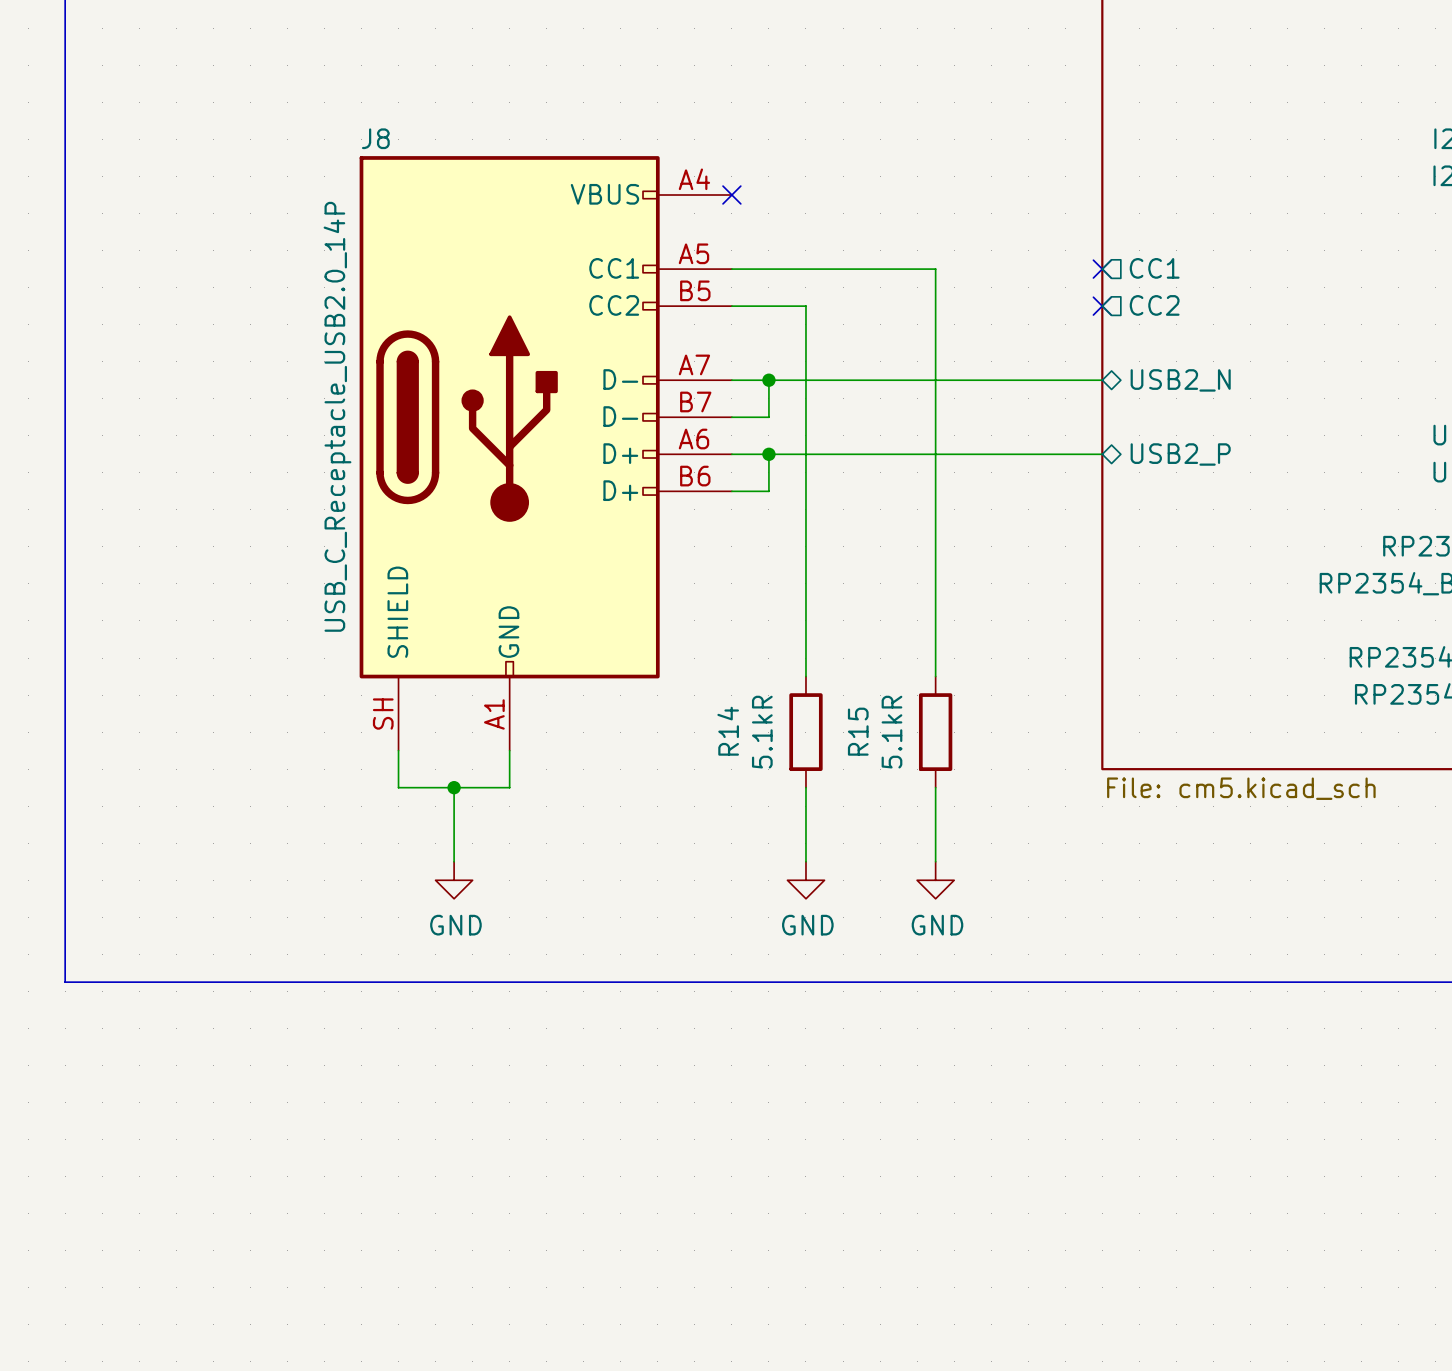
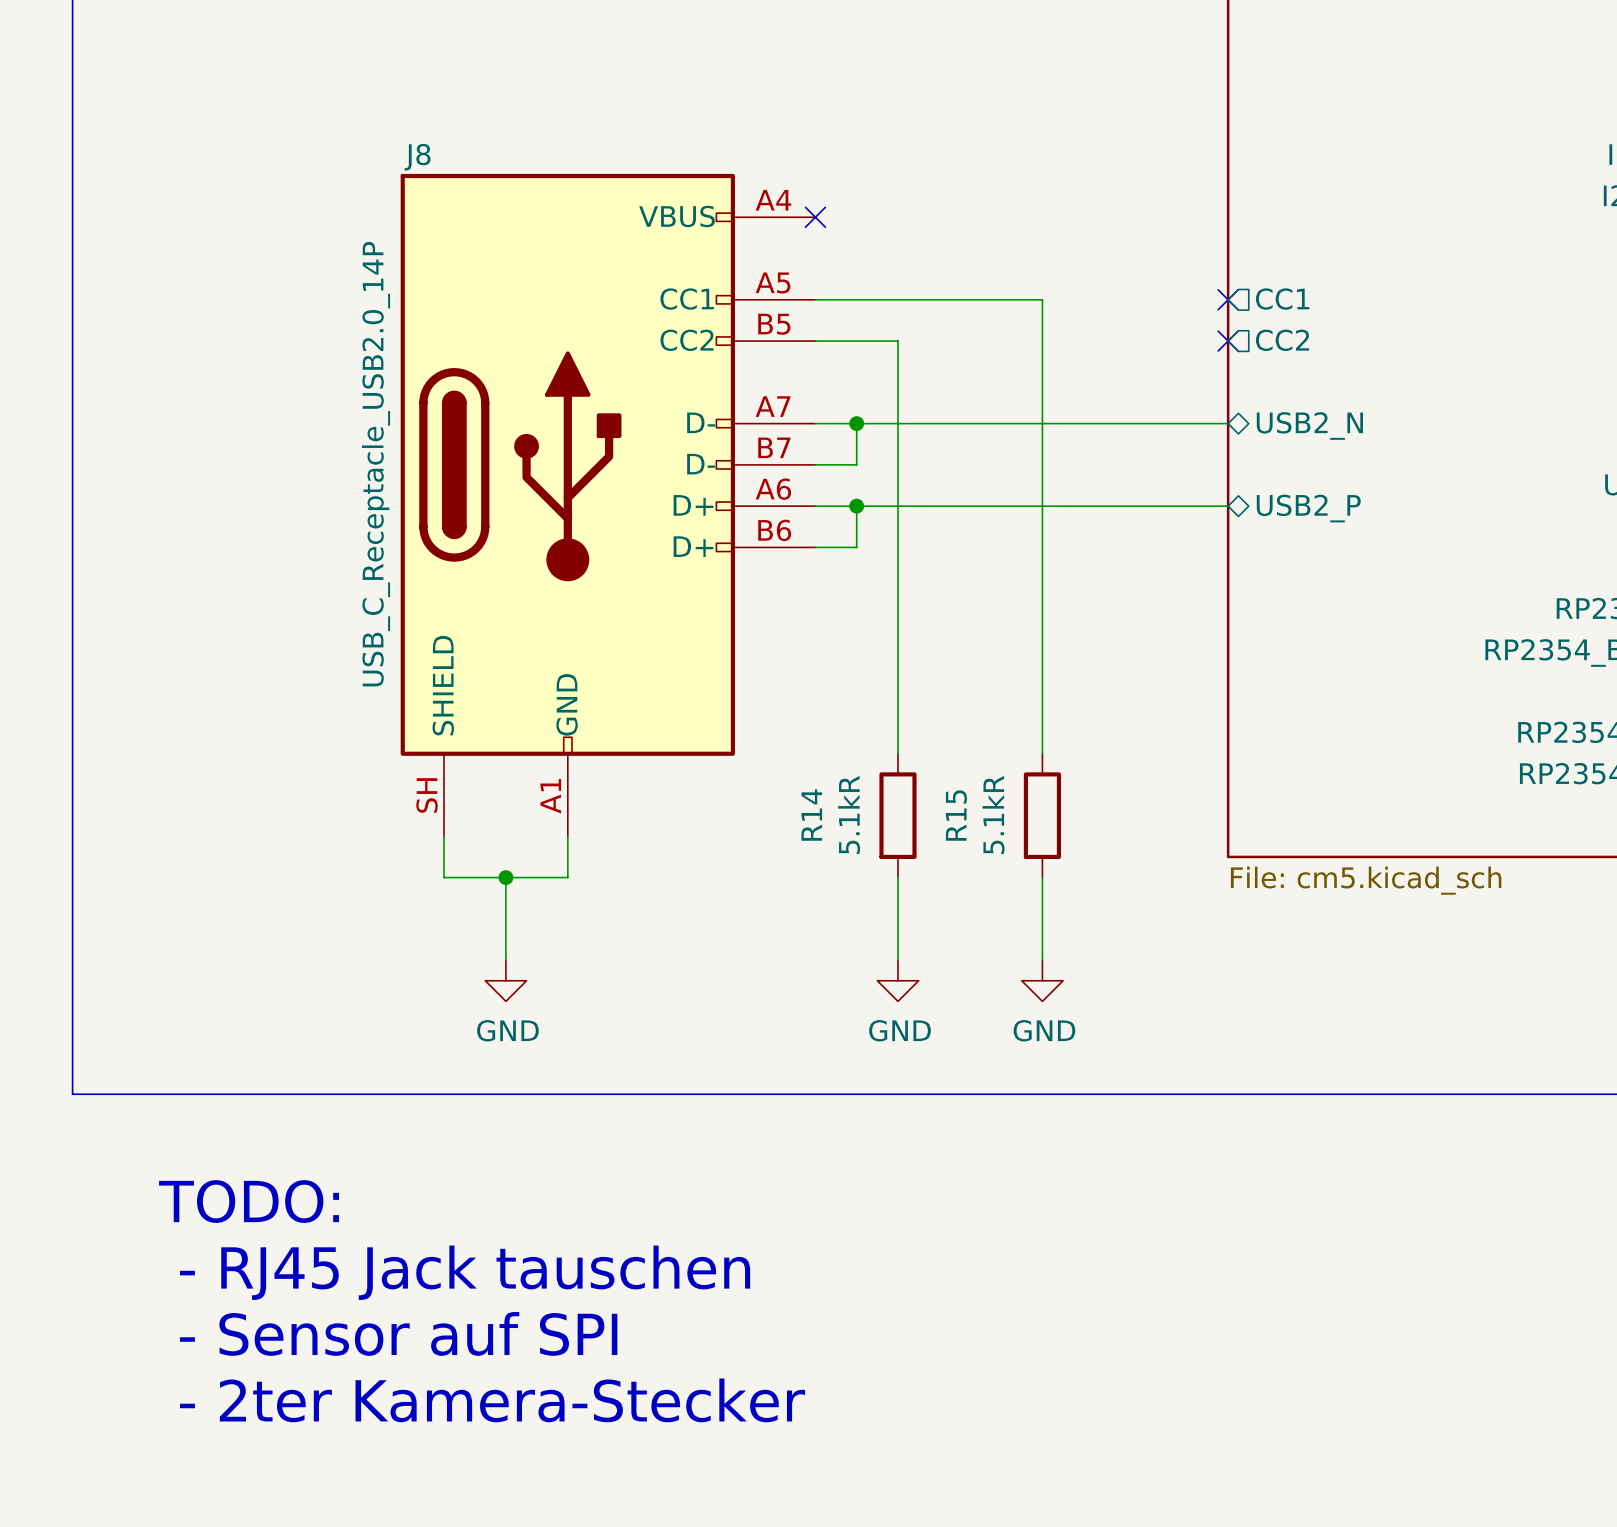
text: none -> TODO: (249, 1201)
text: none -> - RJ45 Jack tauschen (465, 1272)
text: none -> - Sensor auf SPI (398, 1333)
text: none -> - 2ter Kamera-Stecker (492, 1400)

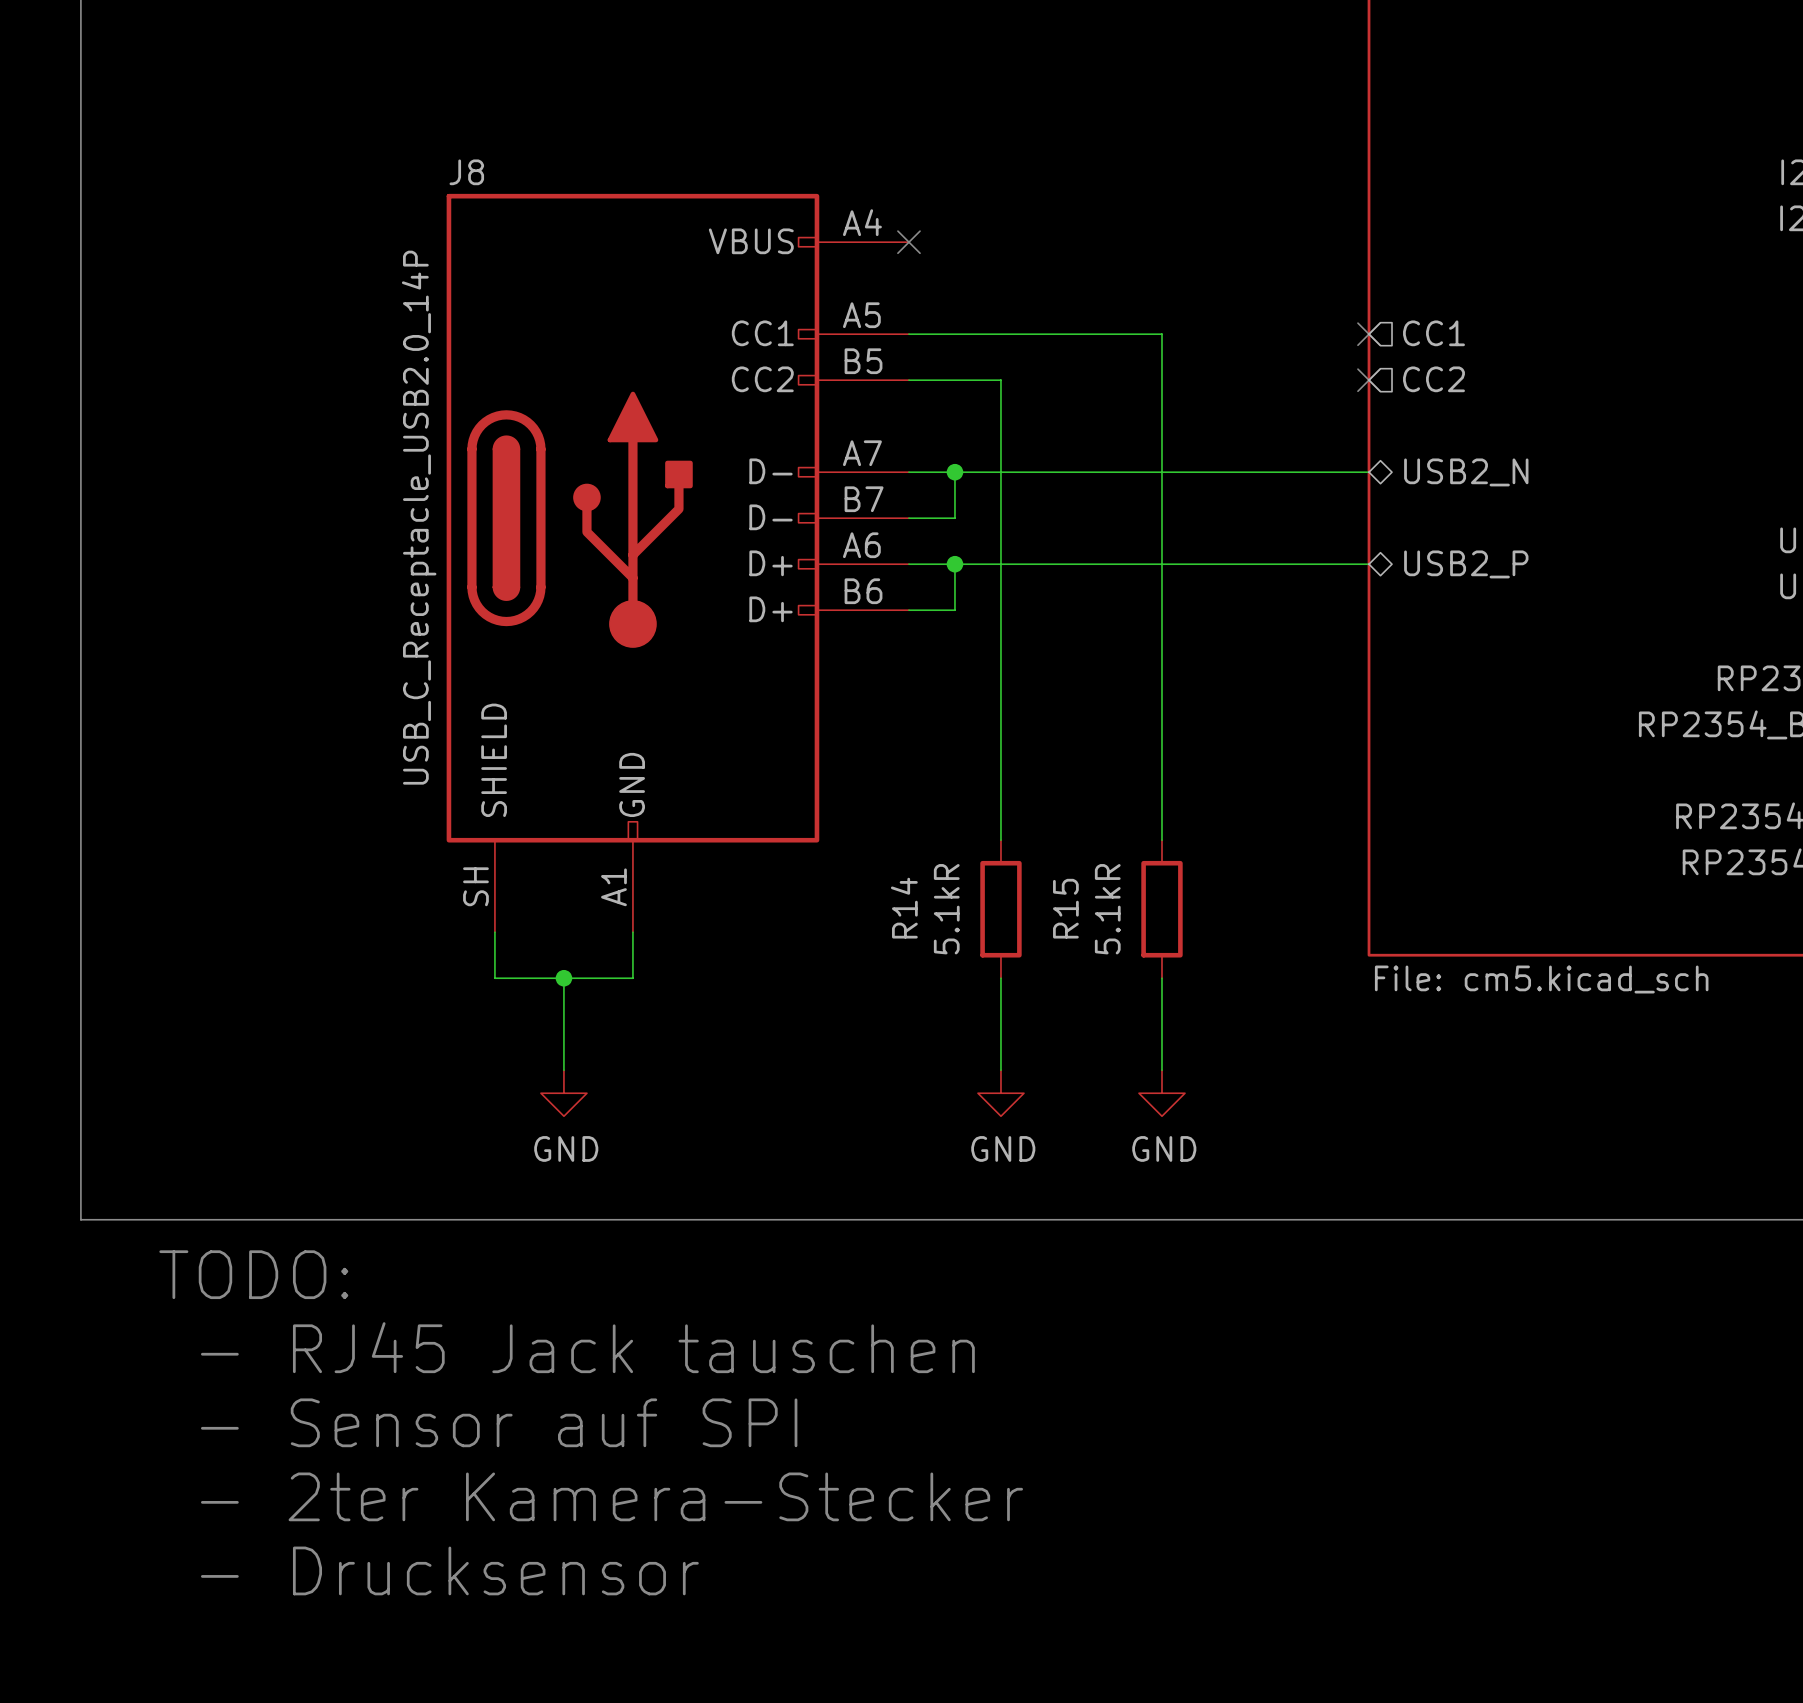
text position: TODO: (249, 1201) -> TODO: (253, 1274)
text position: - RJ45 Jack tauschen (465, 1272) -> - RJ45 Jack tauschen (587, 1347)
text position: - Sensor auf SPI (398, 1333) -> - Sensor auf SPI (499, 1422)
text position: - 2ter Kamera-Stecker (492, 1400) -> - 2ter Kamera-Stecker (611, 1496)
text: none -> - Drucksensor (449, 1570)

